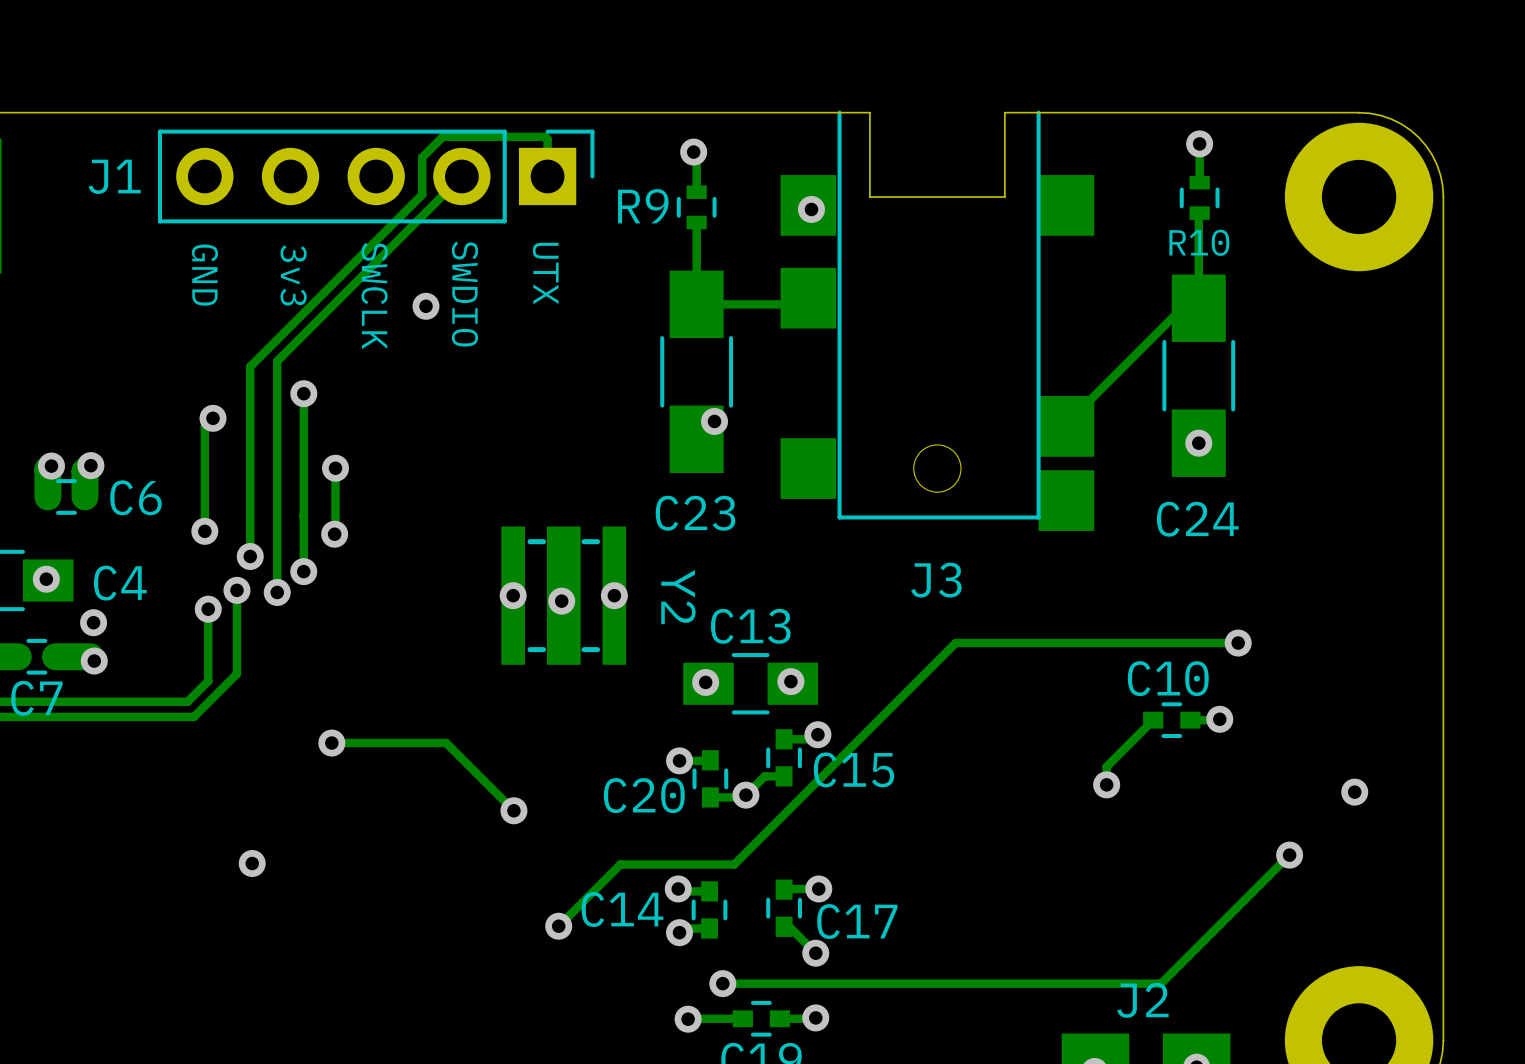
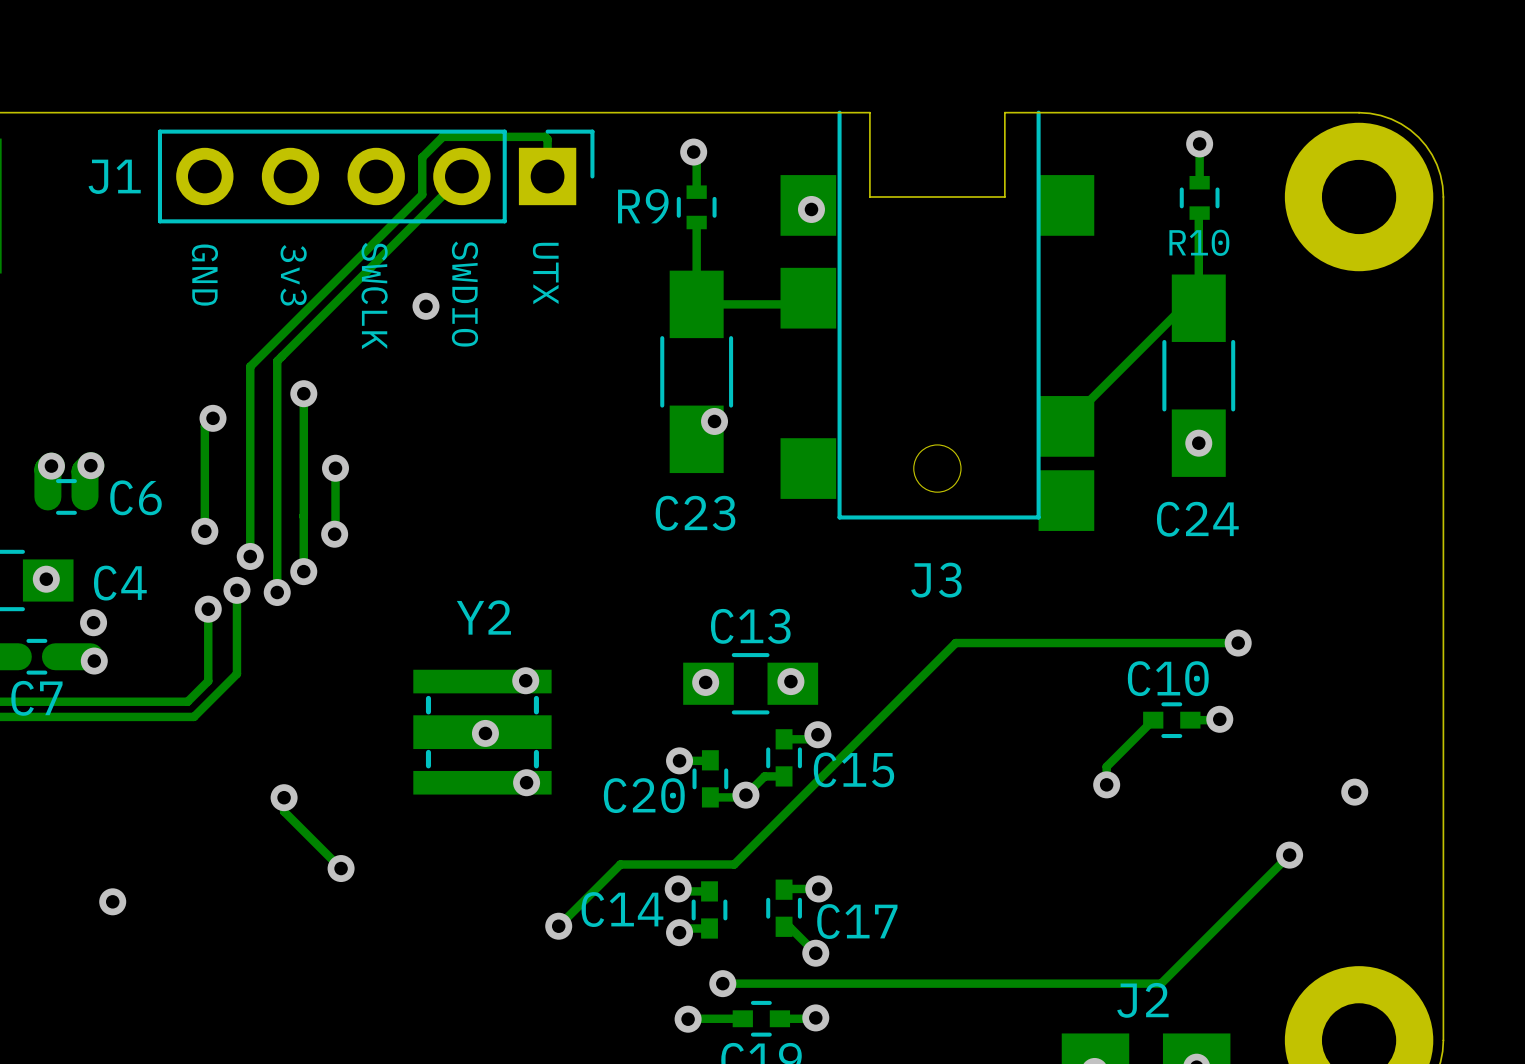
via: (513, 595) -> none
Y2 rotation: 0° (563, 595) -> 90° clockwise (482, 732)
Y2 position: (563, 595) -> (482, 732)
via: (614, 595) -> none
Y2 name position: Y2 (678, 597) -> Y2 (483, 617)
via: (561, 601) -> none
via: none -> (525, 680)
via: none -> (485, 733)
track: (331, 743) (446, 743) (513, 810) -> none
via: (331, 743) -> none
track: none -> (284, 797) (284, 811) (341, 868)
via: none -> (284, 797)
via position: (513, 810) -> (526, 782)
via: (252, 863) -> none
via: none -> (341, 868)
via: none -> (112, 901)

